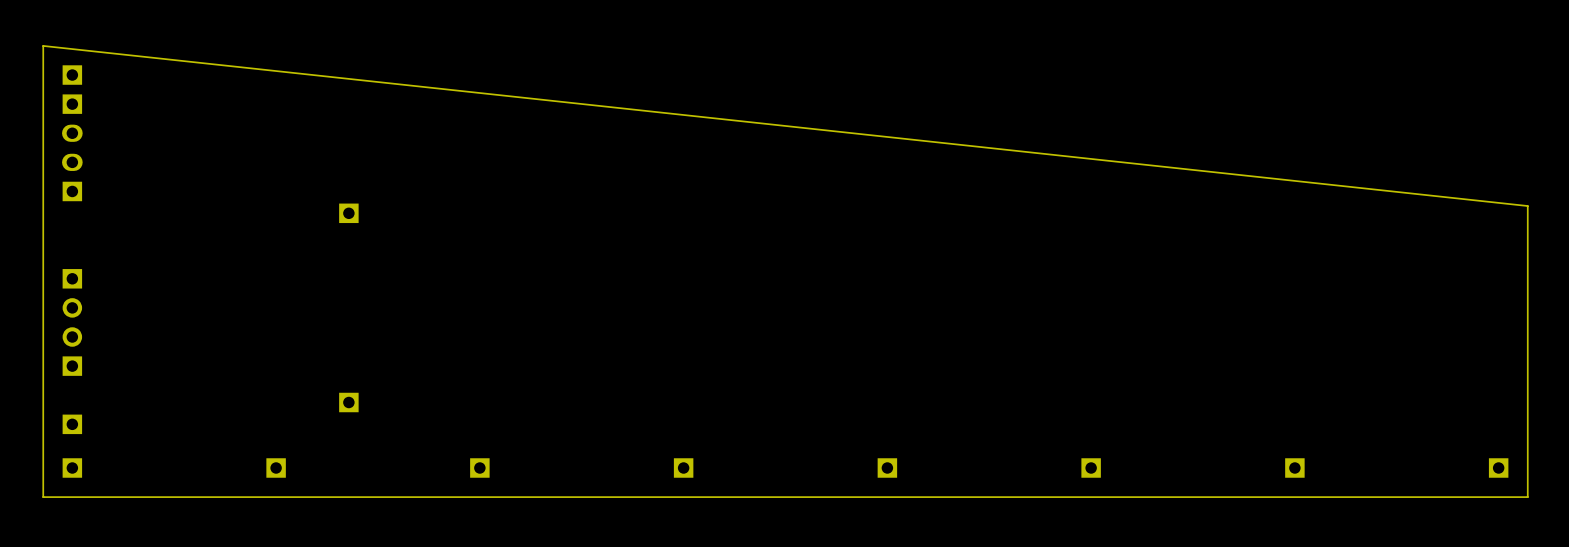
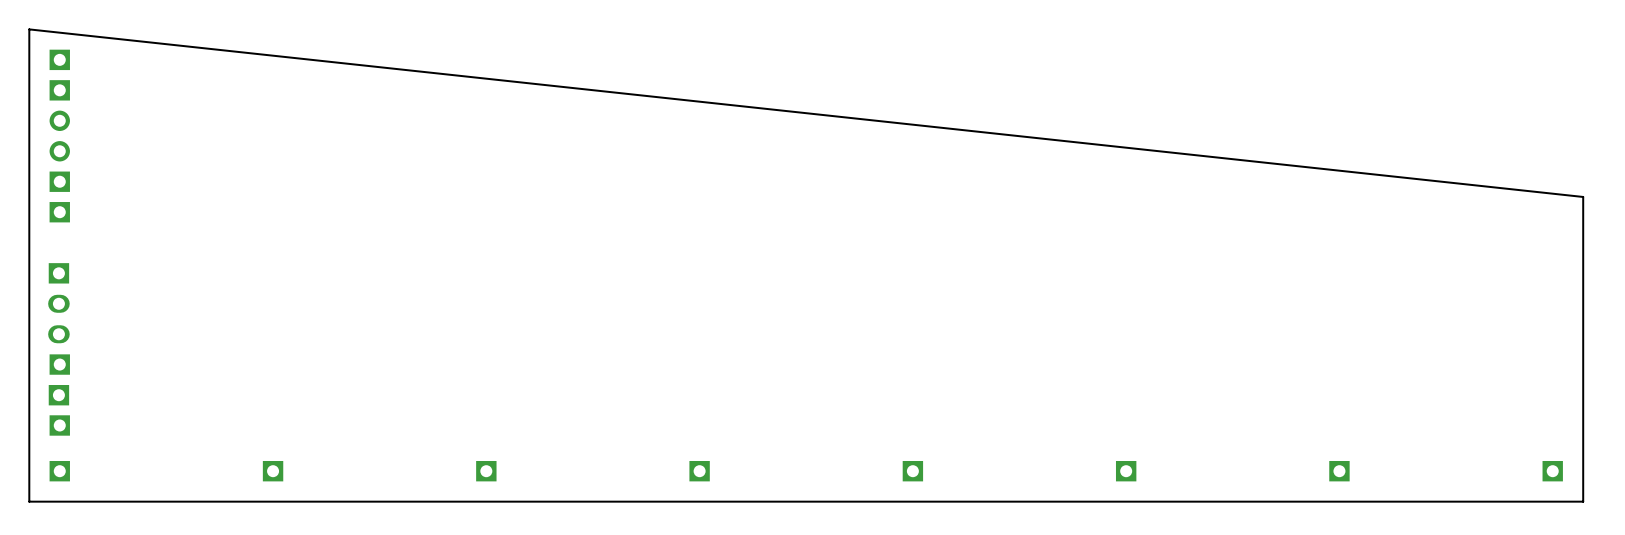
part footprint: [62, 94, 83, 171] -> [49, 80, 70, 162]
part: (348, 213) -> none
part: none -> (59, 212)
part footprint: [62, 269, 83, 347] -> [48, 263, 70, 344]
part: none -> (58, 395)
part: (348, 402) -> none

